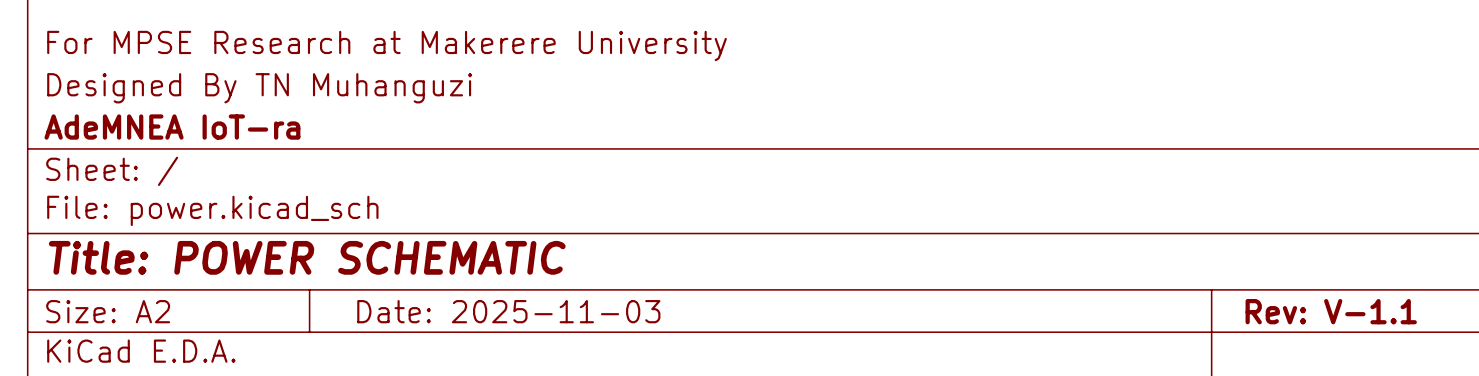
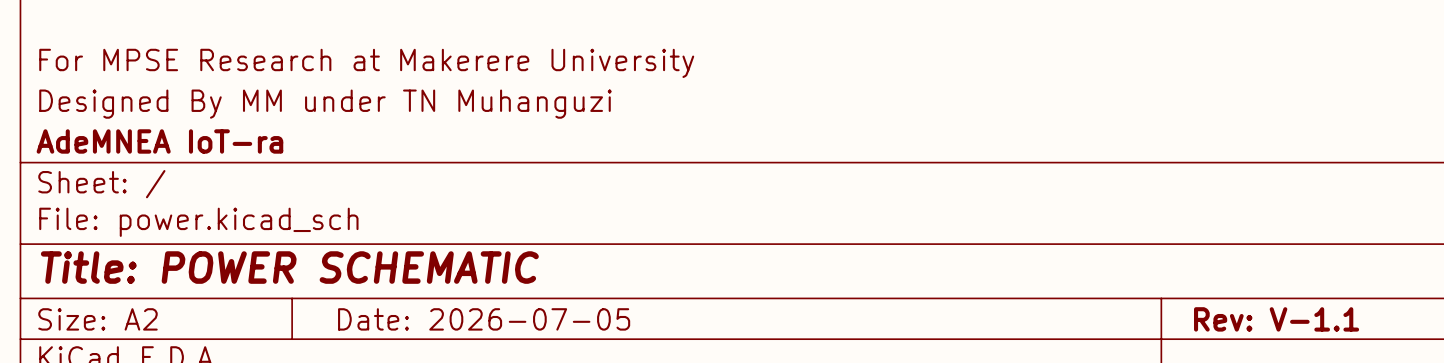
title block: Designed By TN Muhanguzi (259, 88) -> Designed By MM under TN Muhanguzi (325, 104)
title block: Date: 2025-11-03 (508, 311) -> Date: 2026-07-05 (484, 319)

